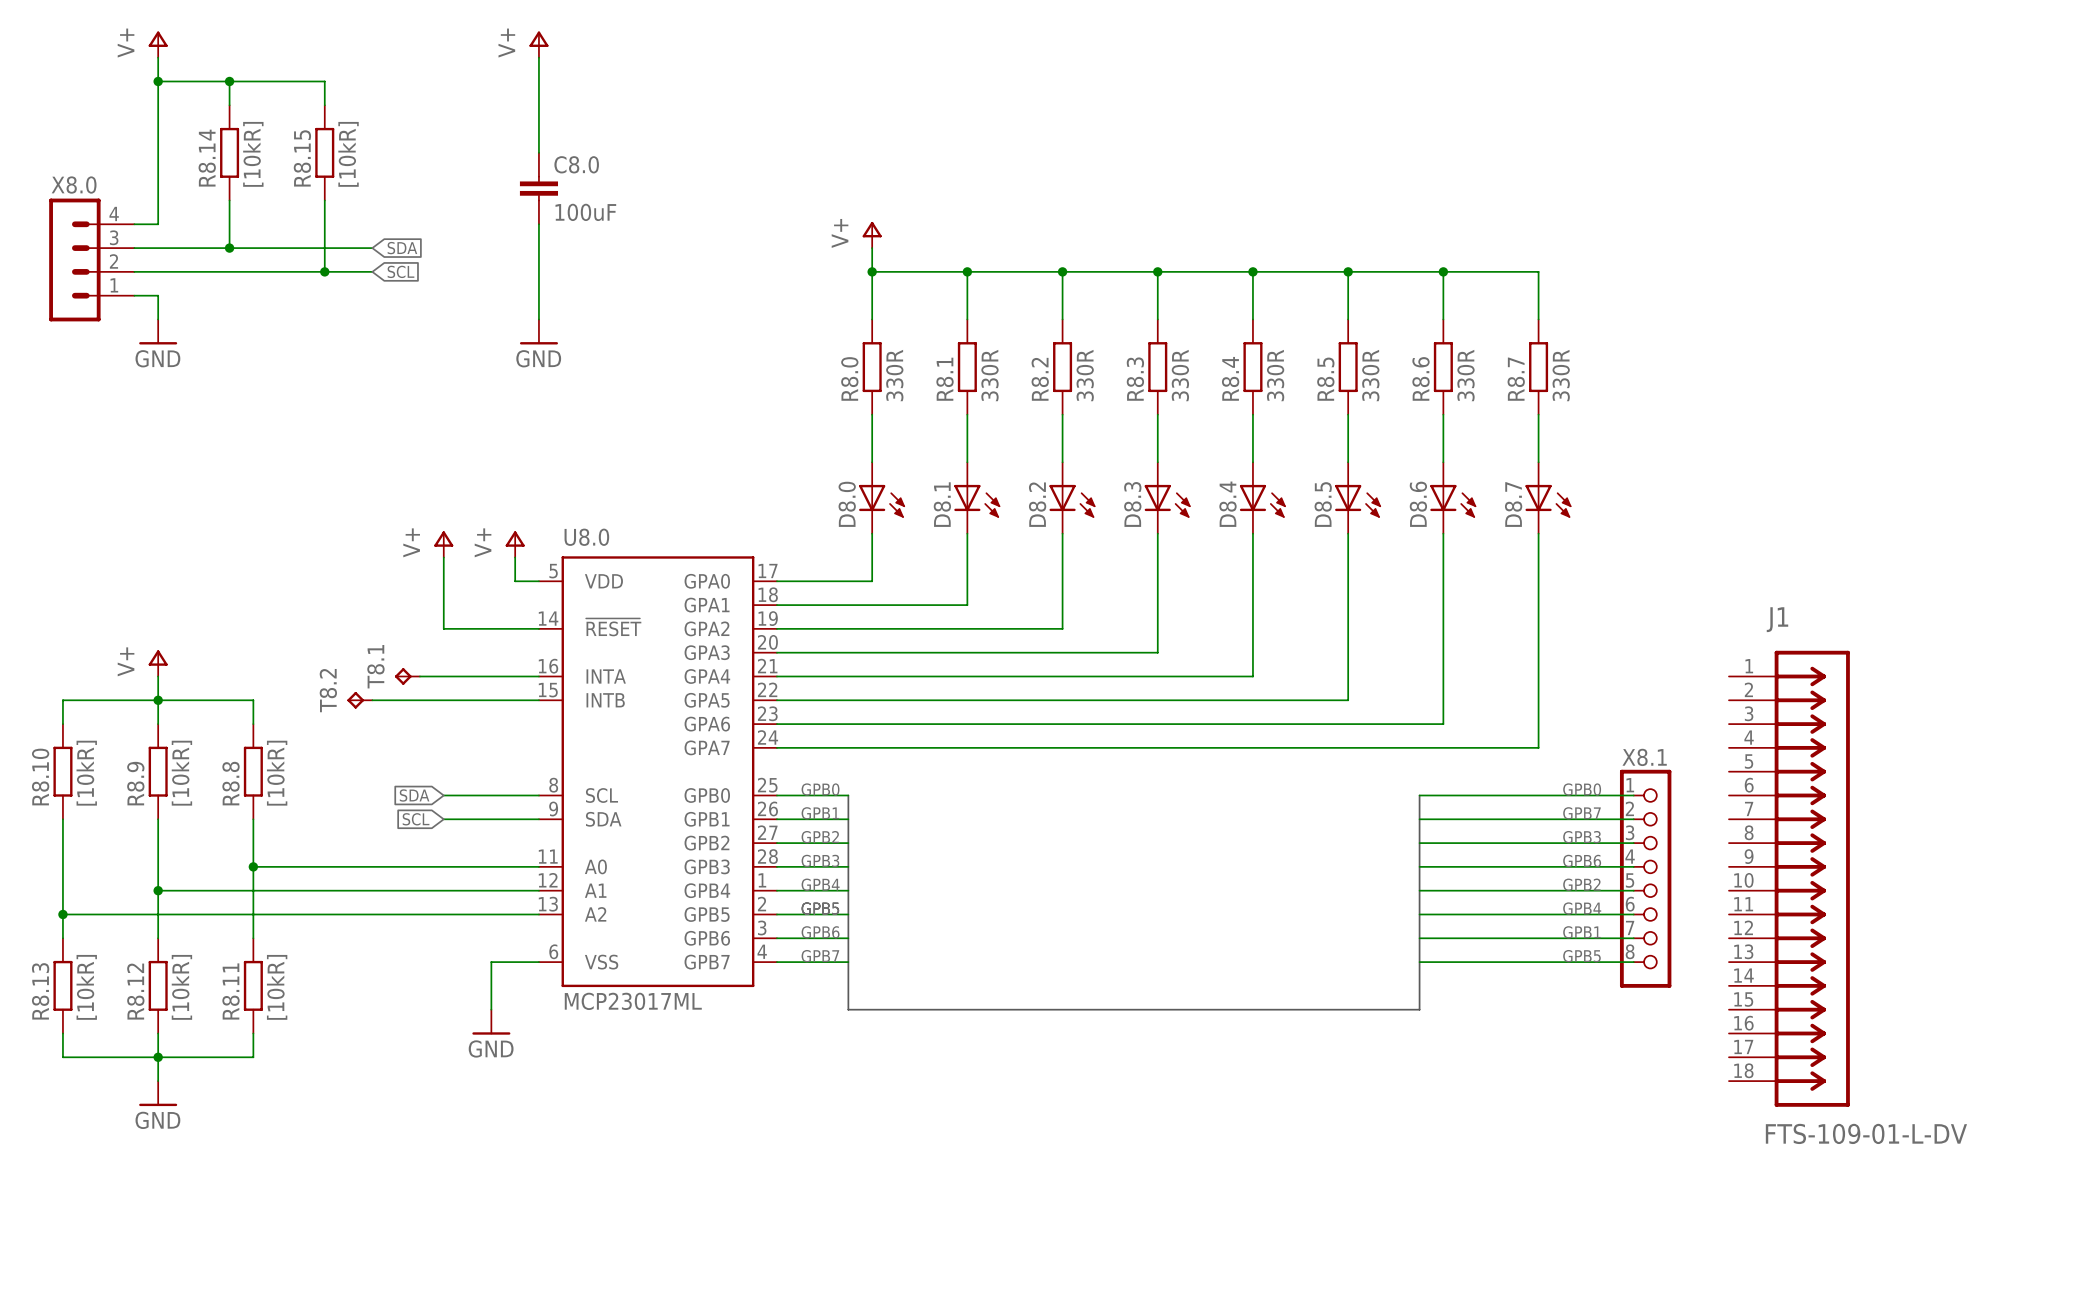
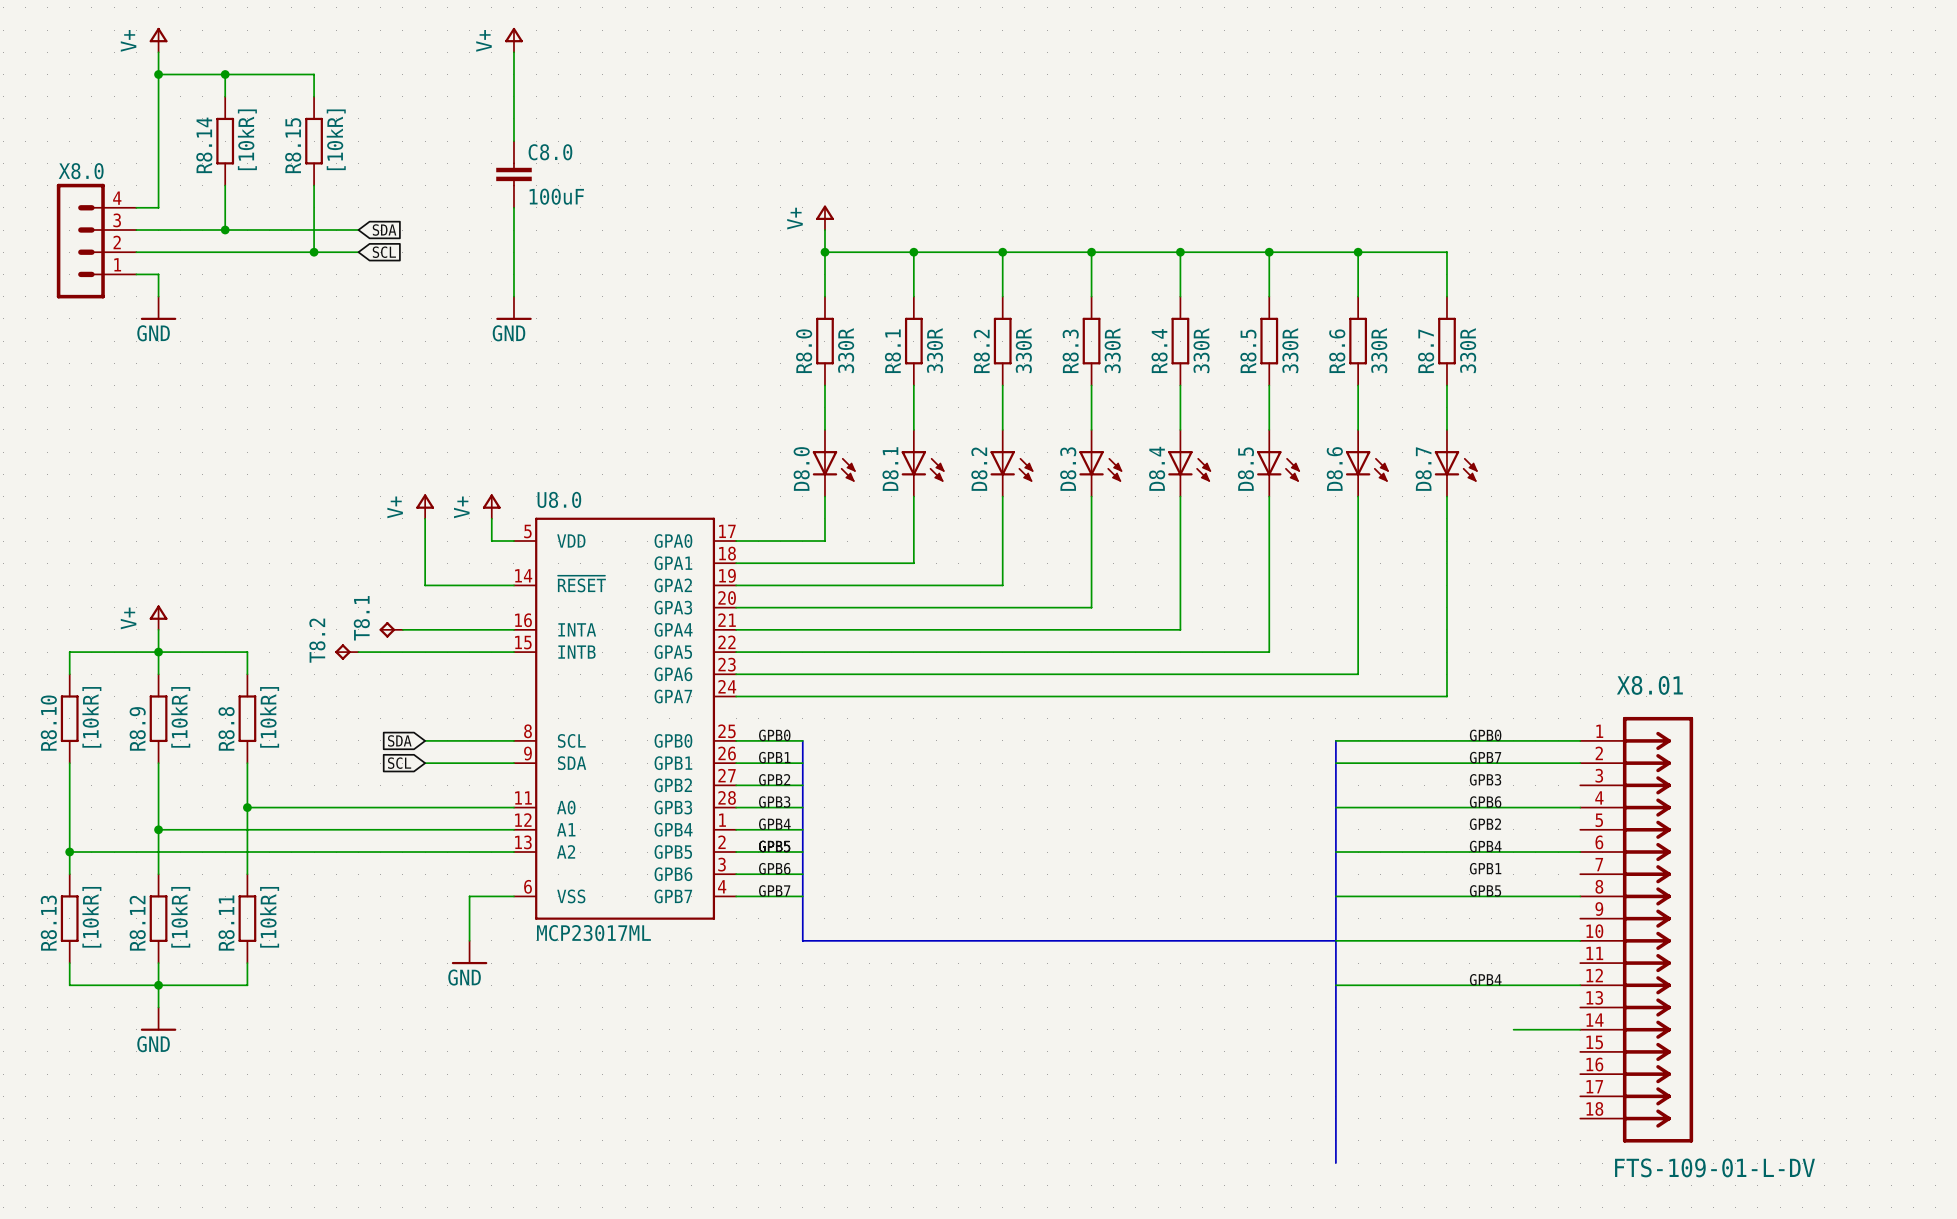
wire: none -> (1535, 740) (1580, 740)
wire: none -> (1535, 763) (1580, 763)
wire: (1419, 843) (1633, 843) -> none
wire: none -> (1535, 807) (1580, 807)
X8.1: (1645, 878) -> none
J1: FTS-109-01-L-DV (1789, 878) -> none
wire: (1419, 890) (1633, 890) -> none
wire: none -> (1535, 852) (1580, 852)
wire: (1419, 938) (1633, 938) -> none
wire: none -> (1535, 896) (1580, 896)
X8.01: none -> FTS-109-01-L-DV (1636, 929)
bus: none -> (1335, 940) (1335, 1163)
wire: none -> (1335, 940) (1580, 940)
label: none -> GPB4 (1485, 979)
wire: none -> (1335, 985) (1580, 985)
wire: none -> (1513, 1029) (1580, 1029)

